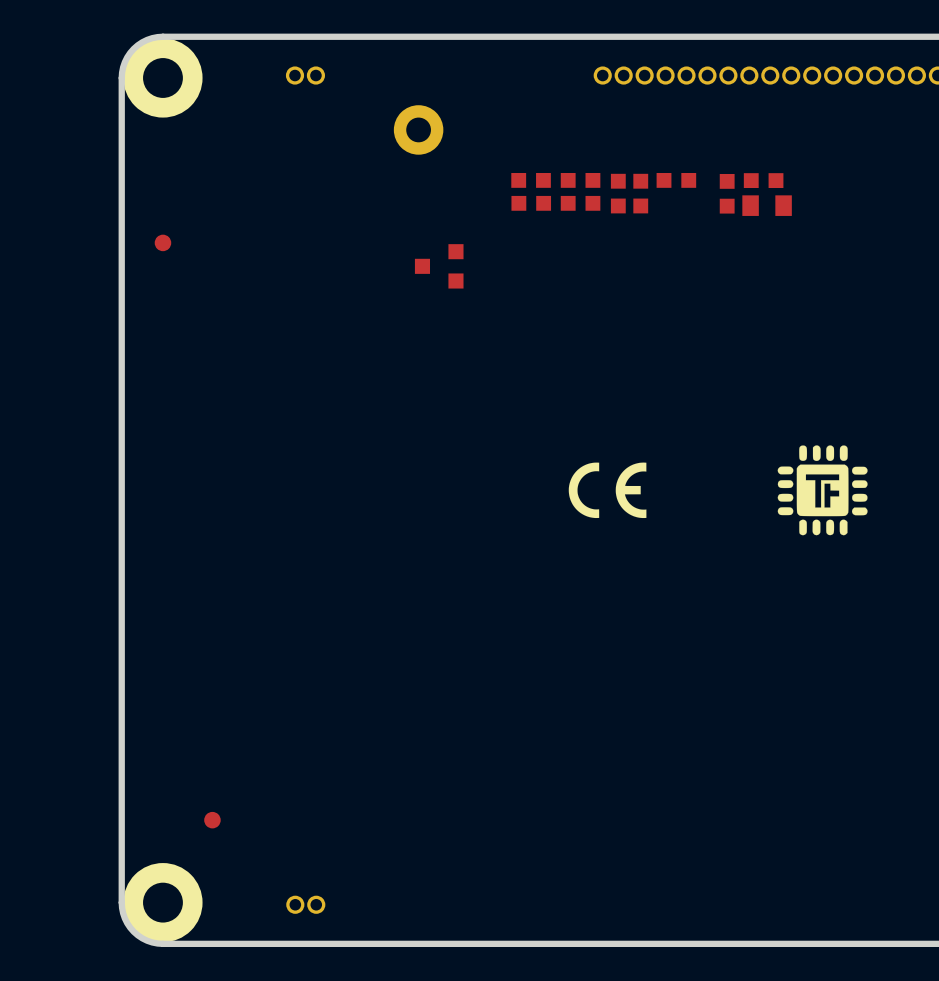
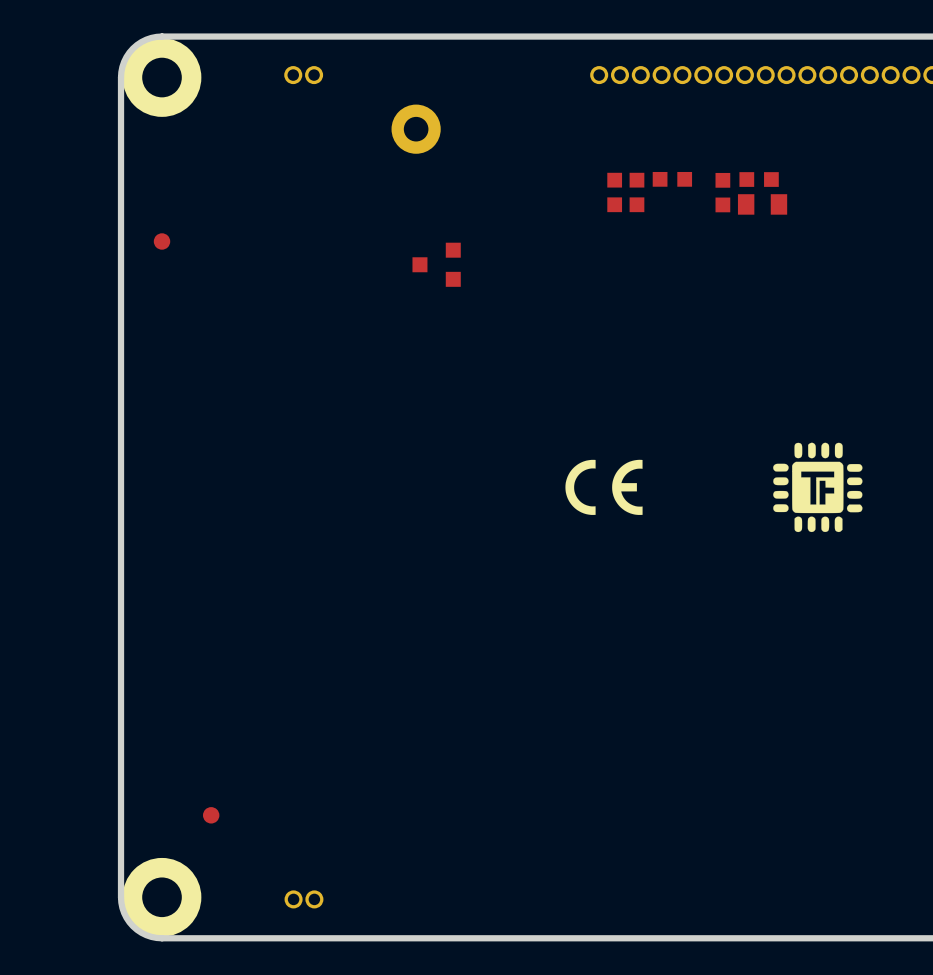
part: (531, 180) -> none
part: (580, 180) -> none
part: (531, 203) -> none
part: (580, 203) -> none

